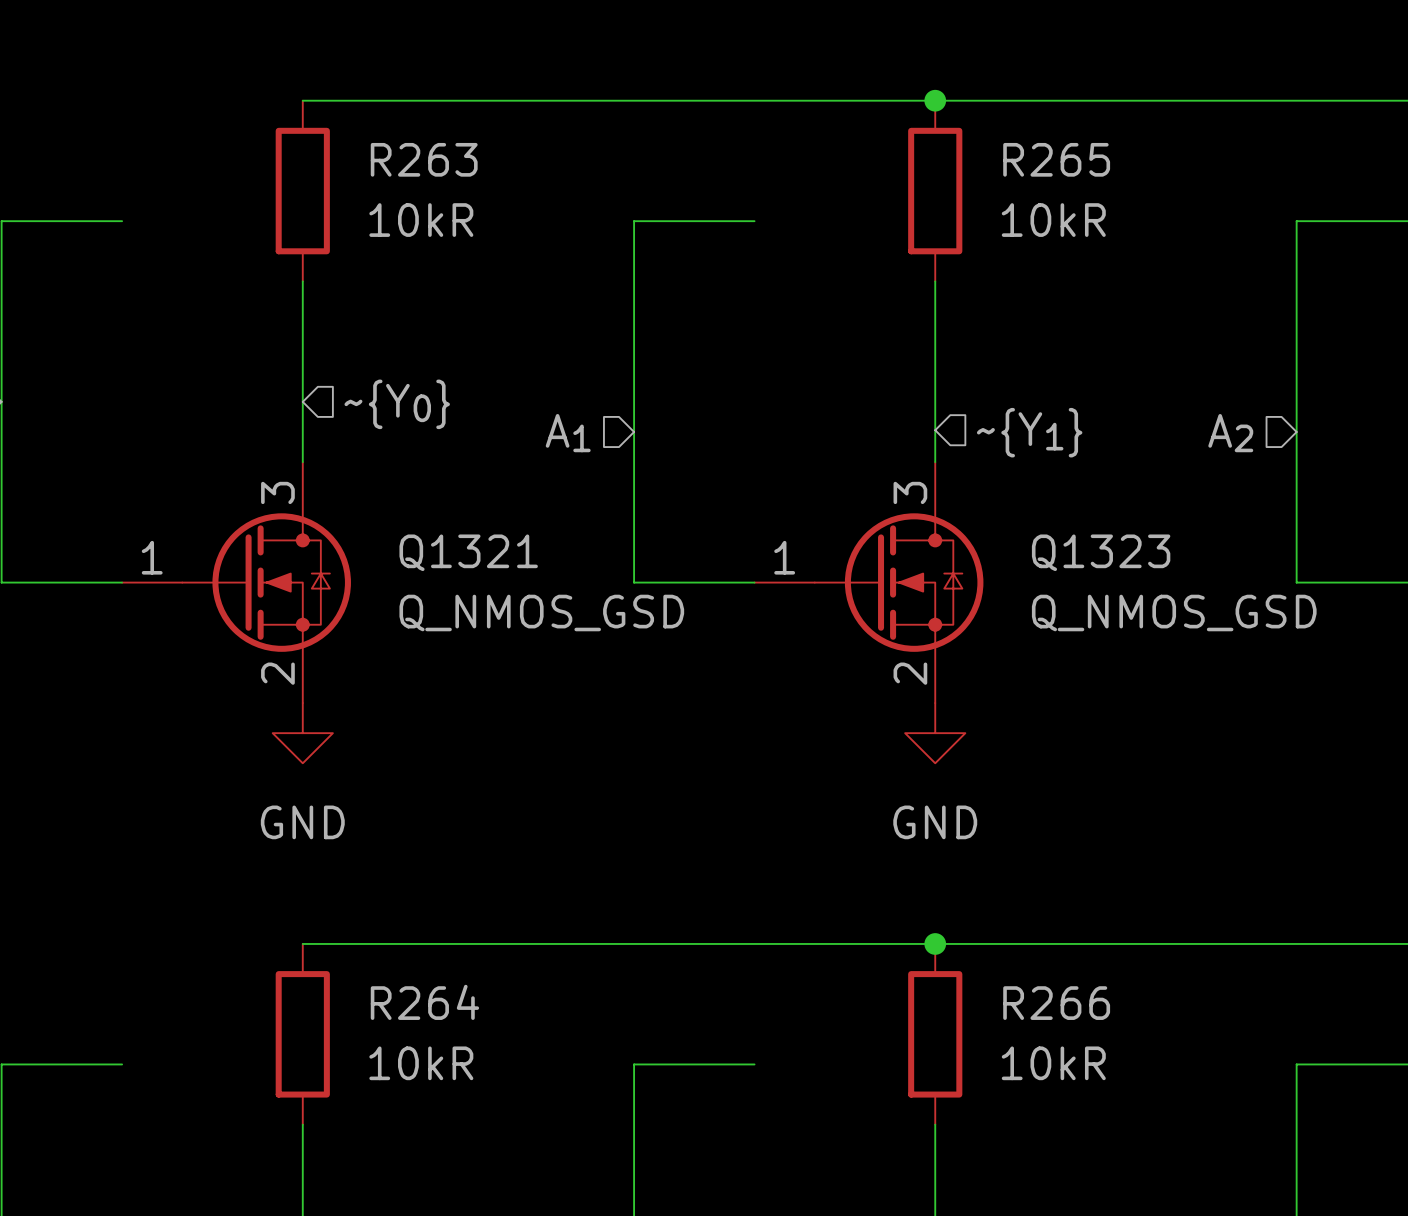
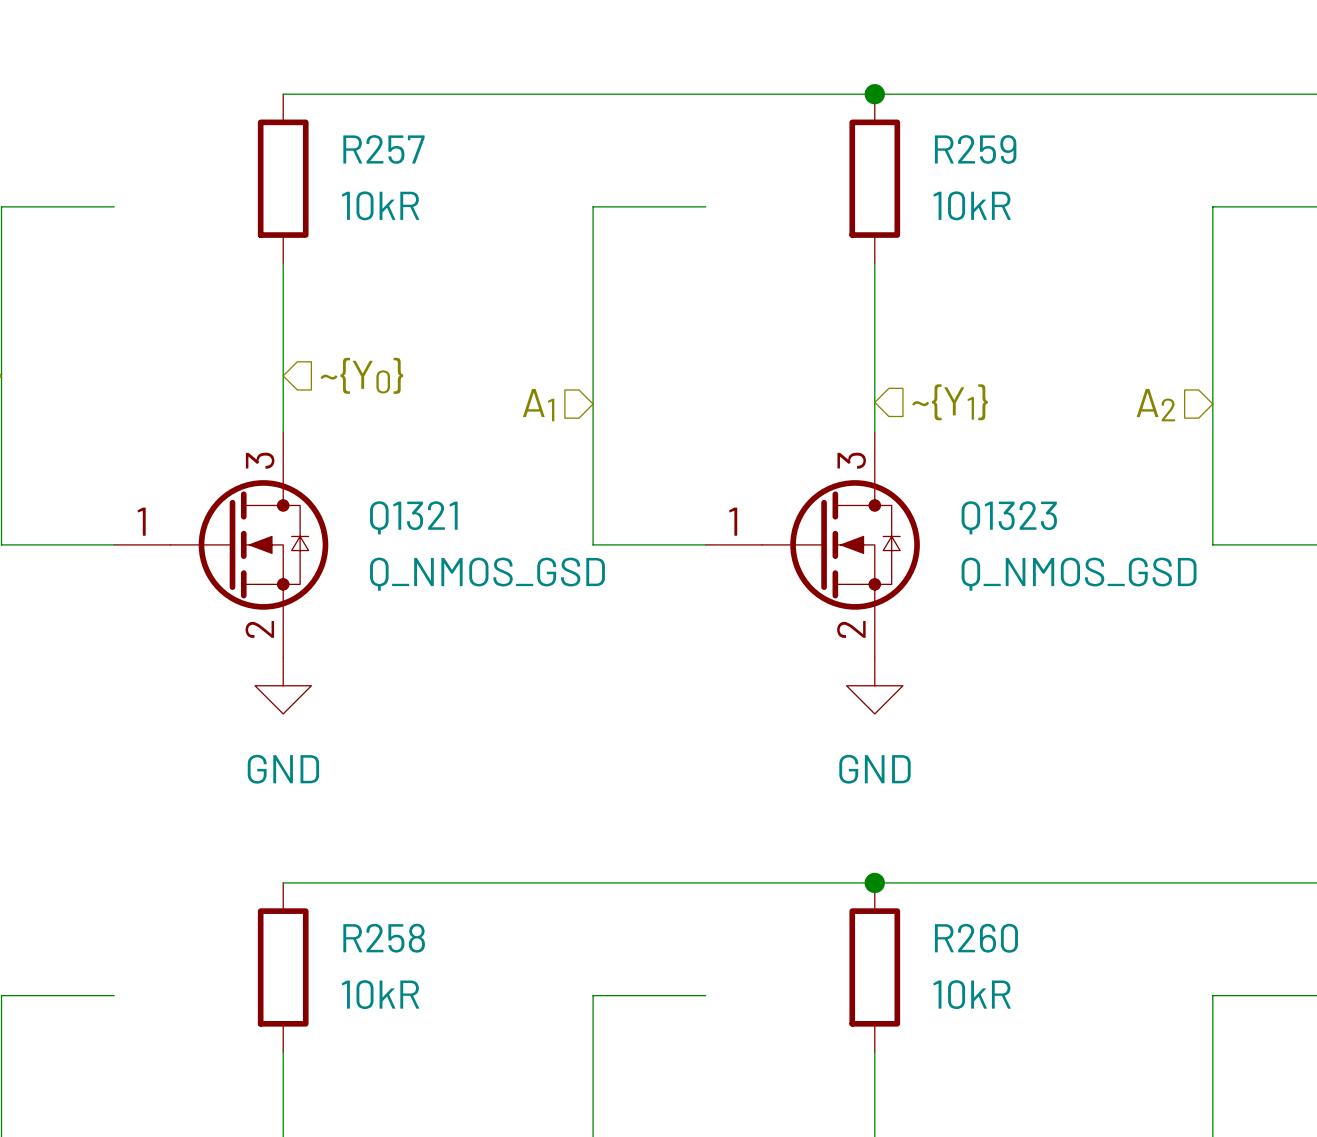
R263 name: R263 (424, 159) -> R257 (383, 149)
R265 name: R265 (1056, 159) -> R259 (975, 149)
R264 name: R264 (424, 1002) -> R258 (384, 938)
R266 name: R266 (1056, 1003) -> R260 (976, 938)

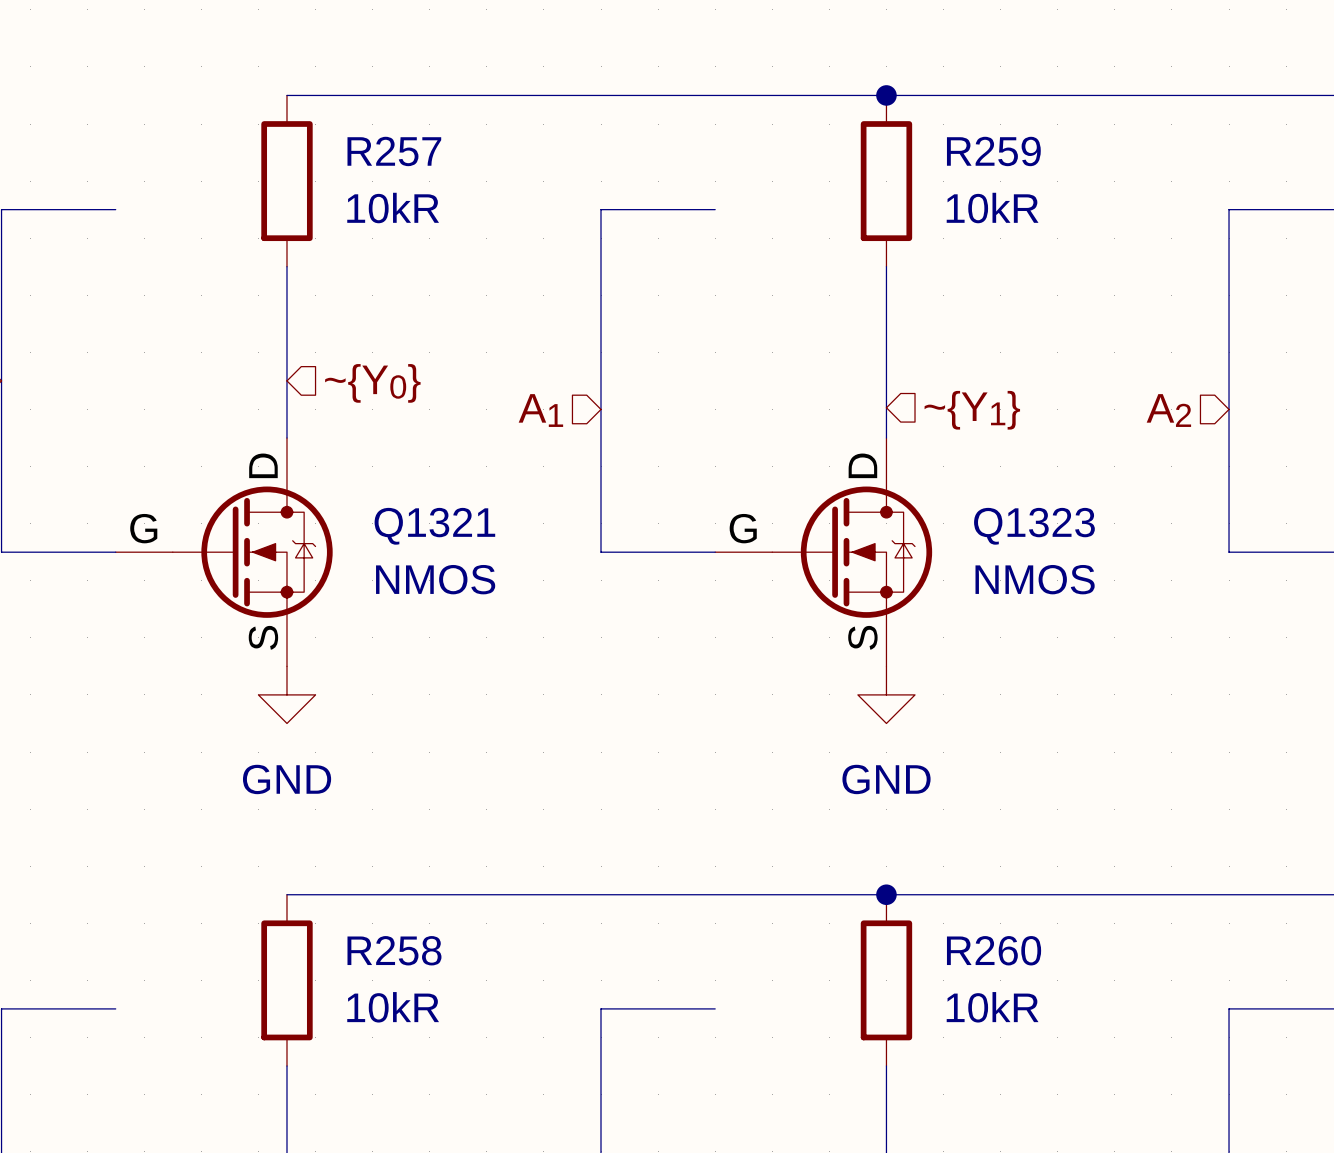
Q1321 symbol: [114, 432, 329, 658] -> [115, 438, 333, 667]
Q1323 symbol: [705, 432, 920, 658] -> [715, 438, 933, 667]
Q1321 value: Q_NMOS_GSD (487, 574) -> NMOS (435, 579)
Q1323 value: Q_NMOS_GSD (1079, 574) -> NMOS (1035, 579)

